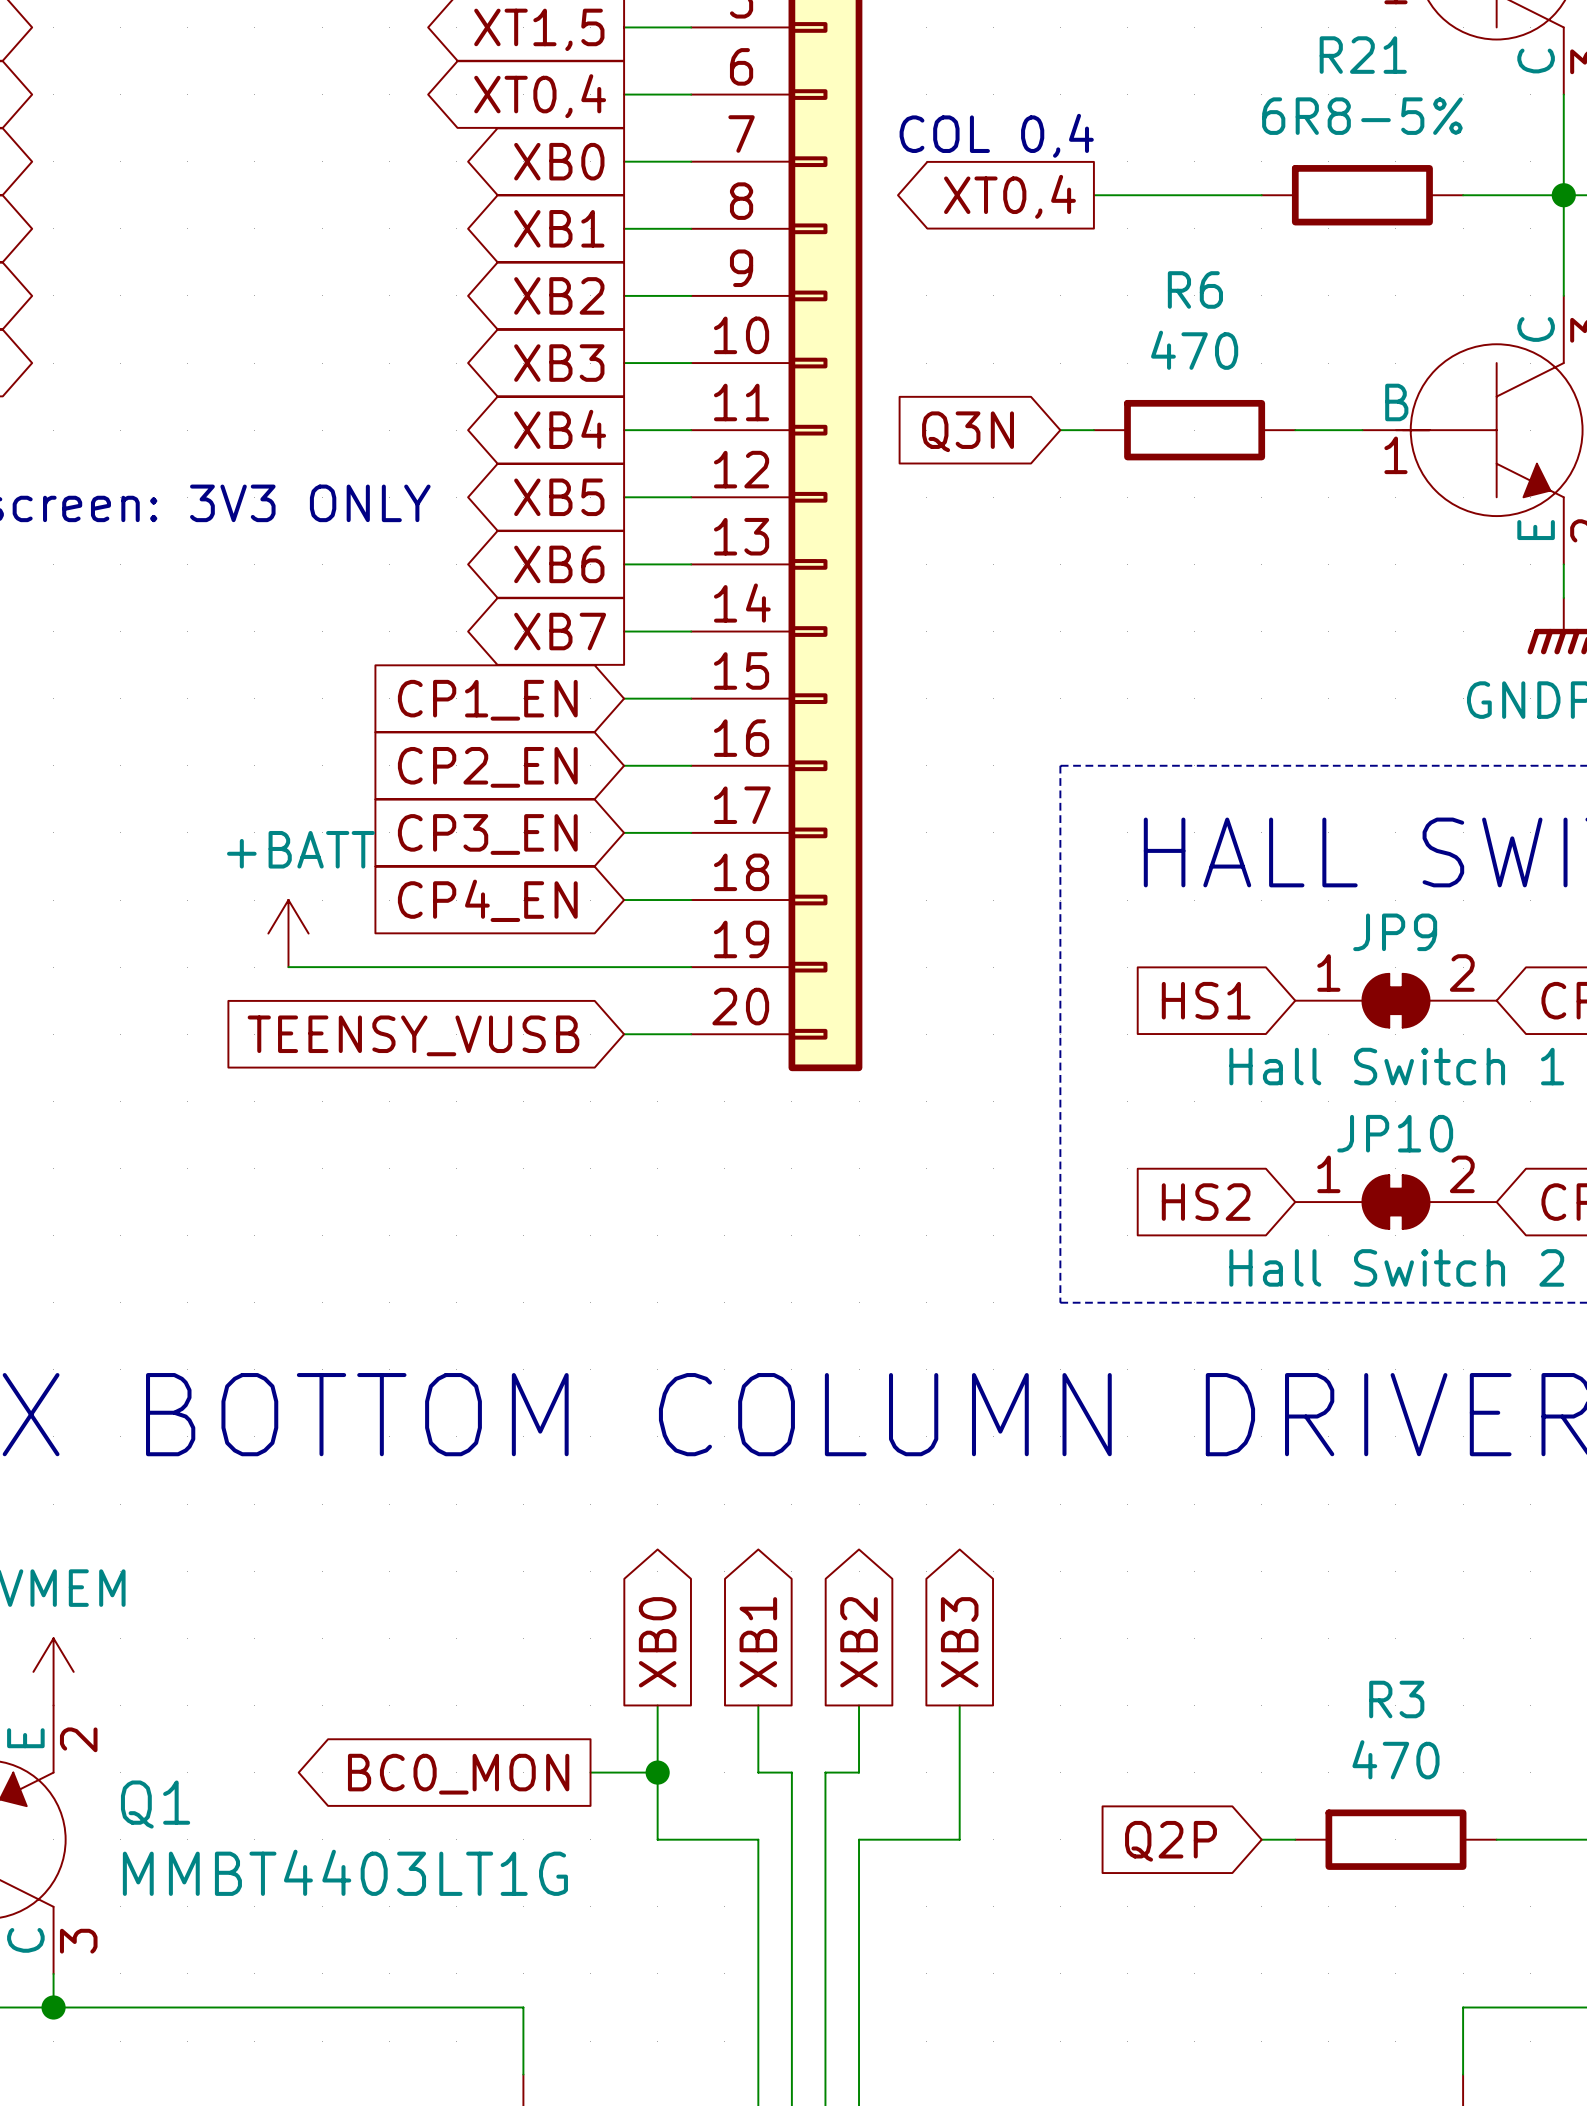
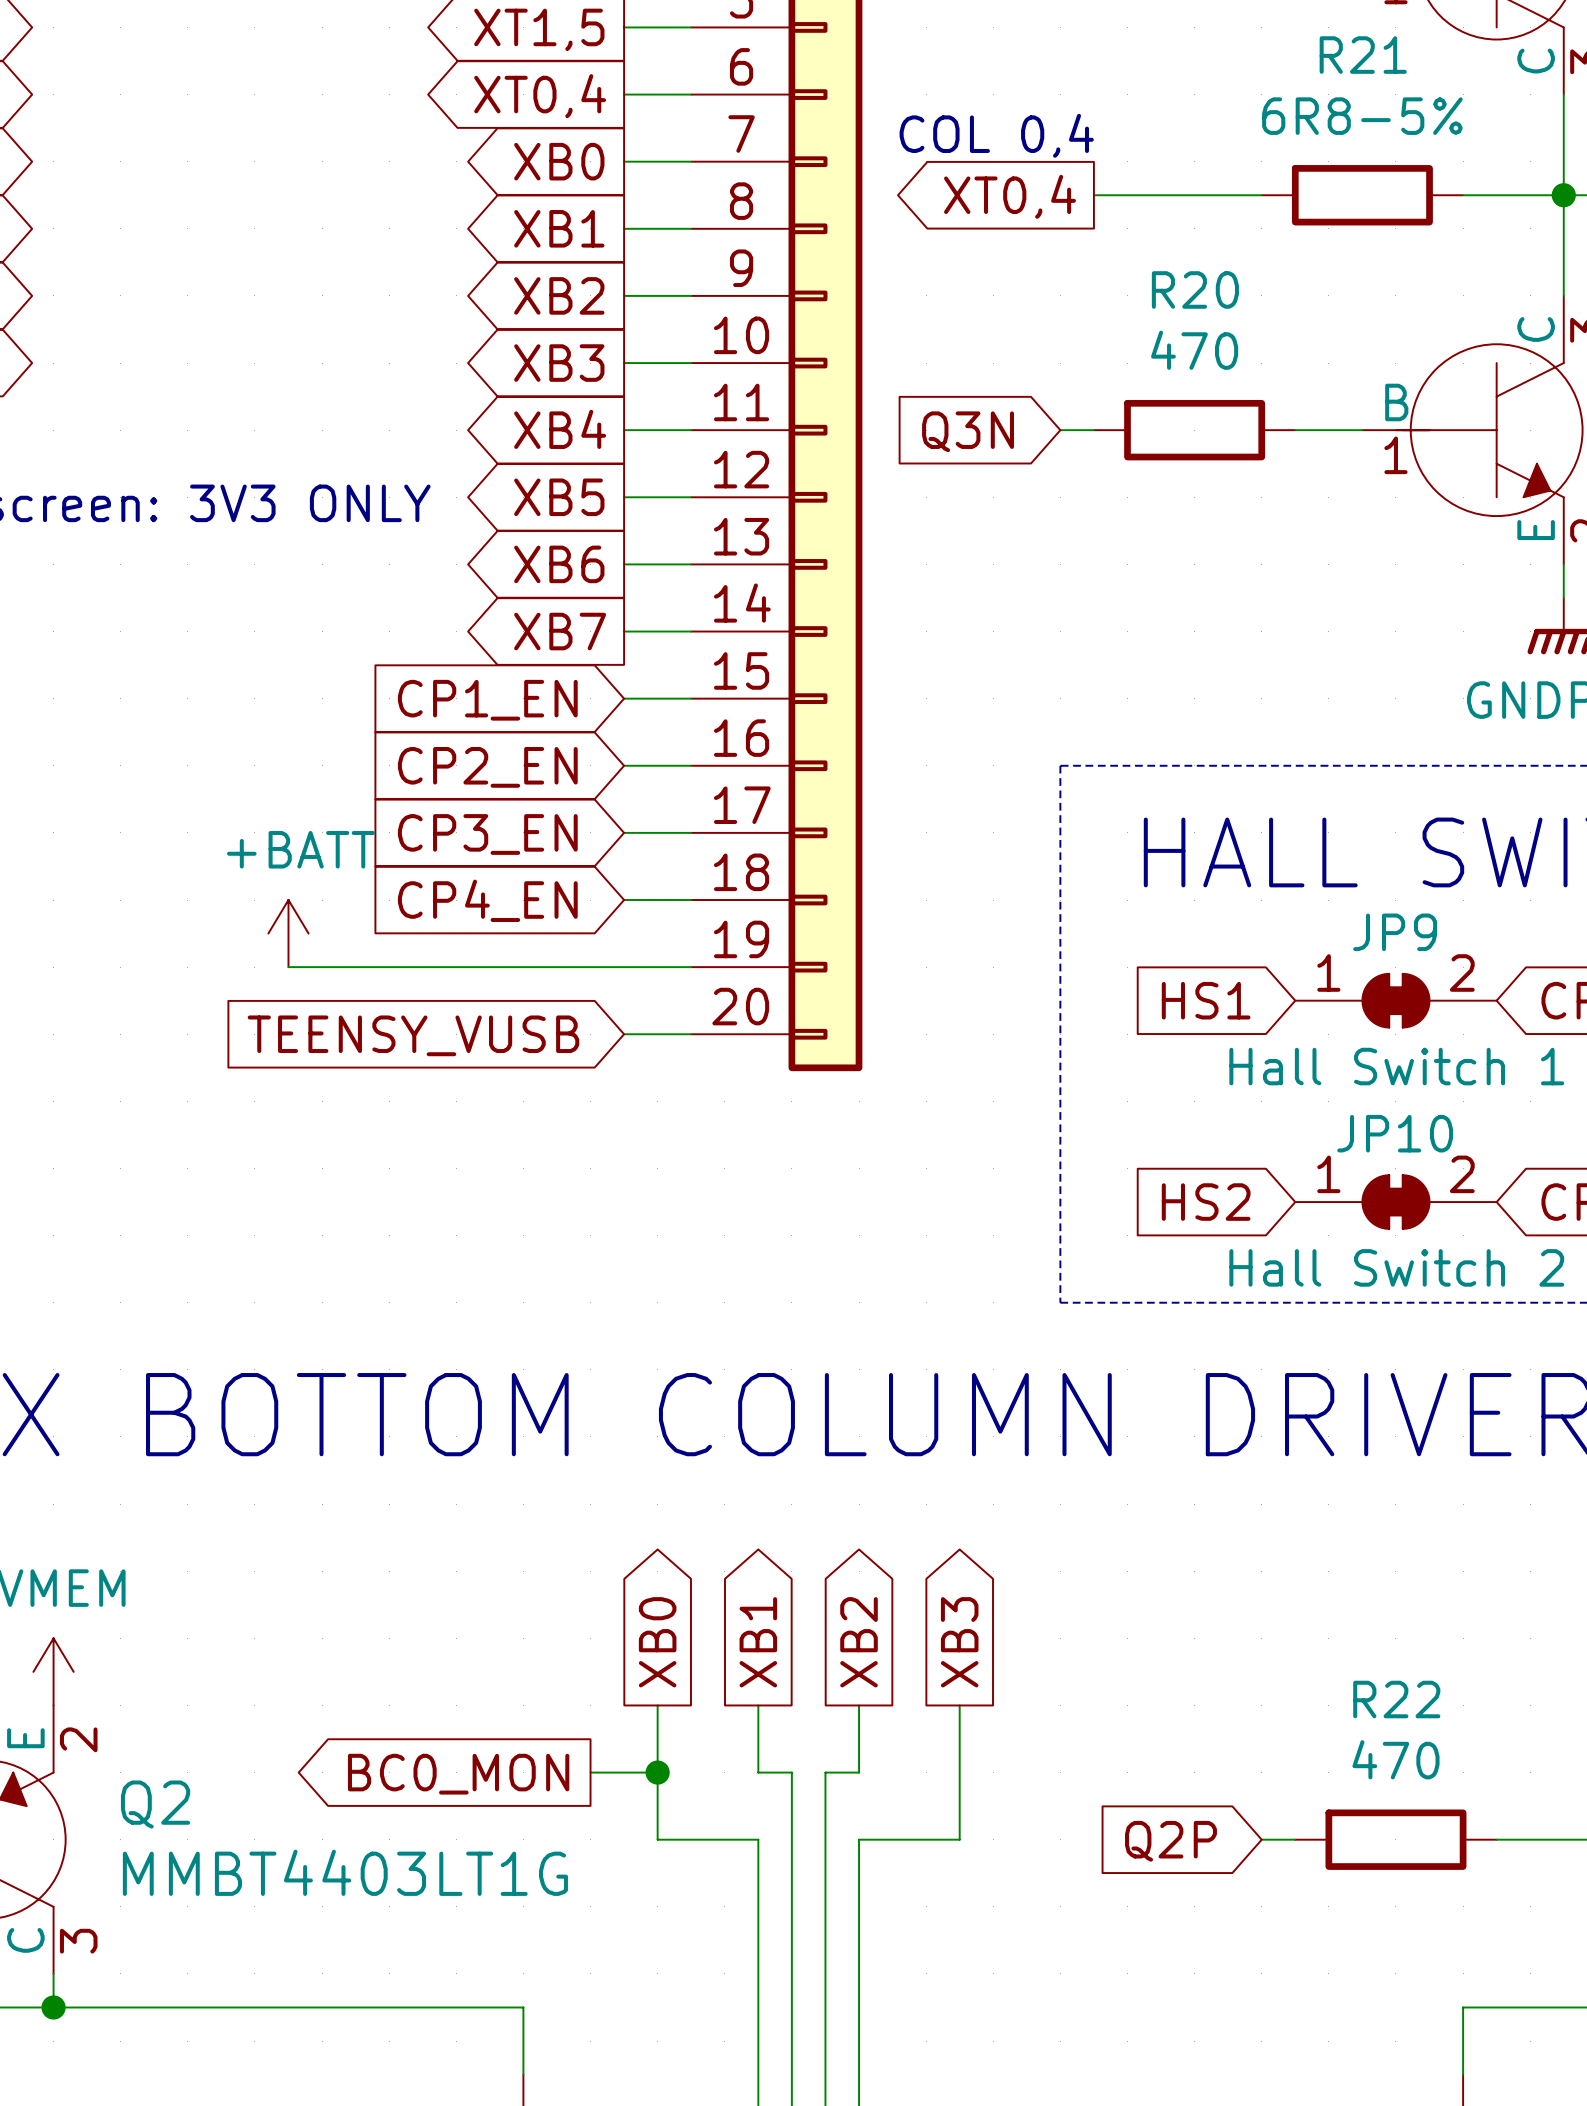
R6 name: R6 (1195, 289) -> R20 (1195, 289)
R3 name: R3 (1396, 1699) -> R22 (1396, 1699)
Q1 name: Q1 (155, 1804) -> Q2 (155, 1804)

